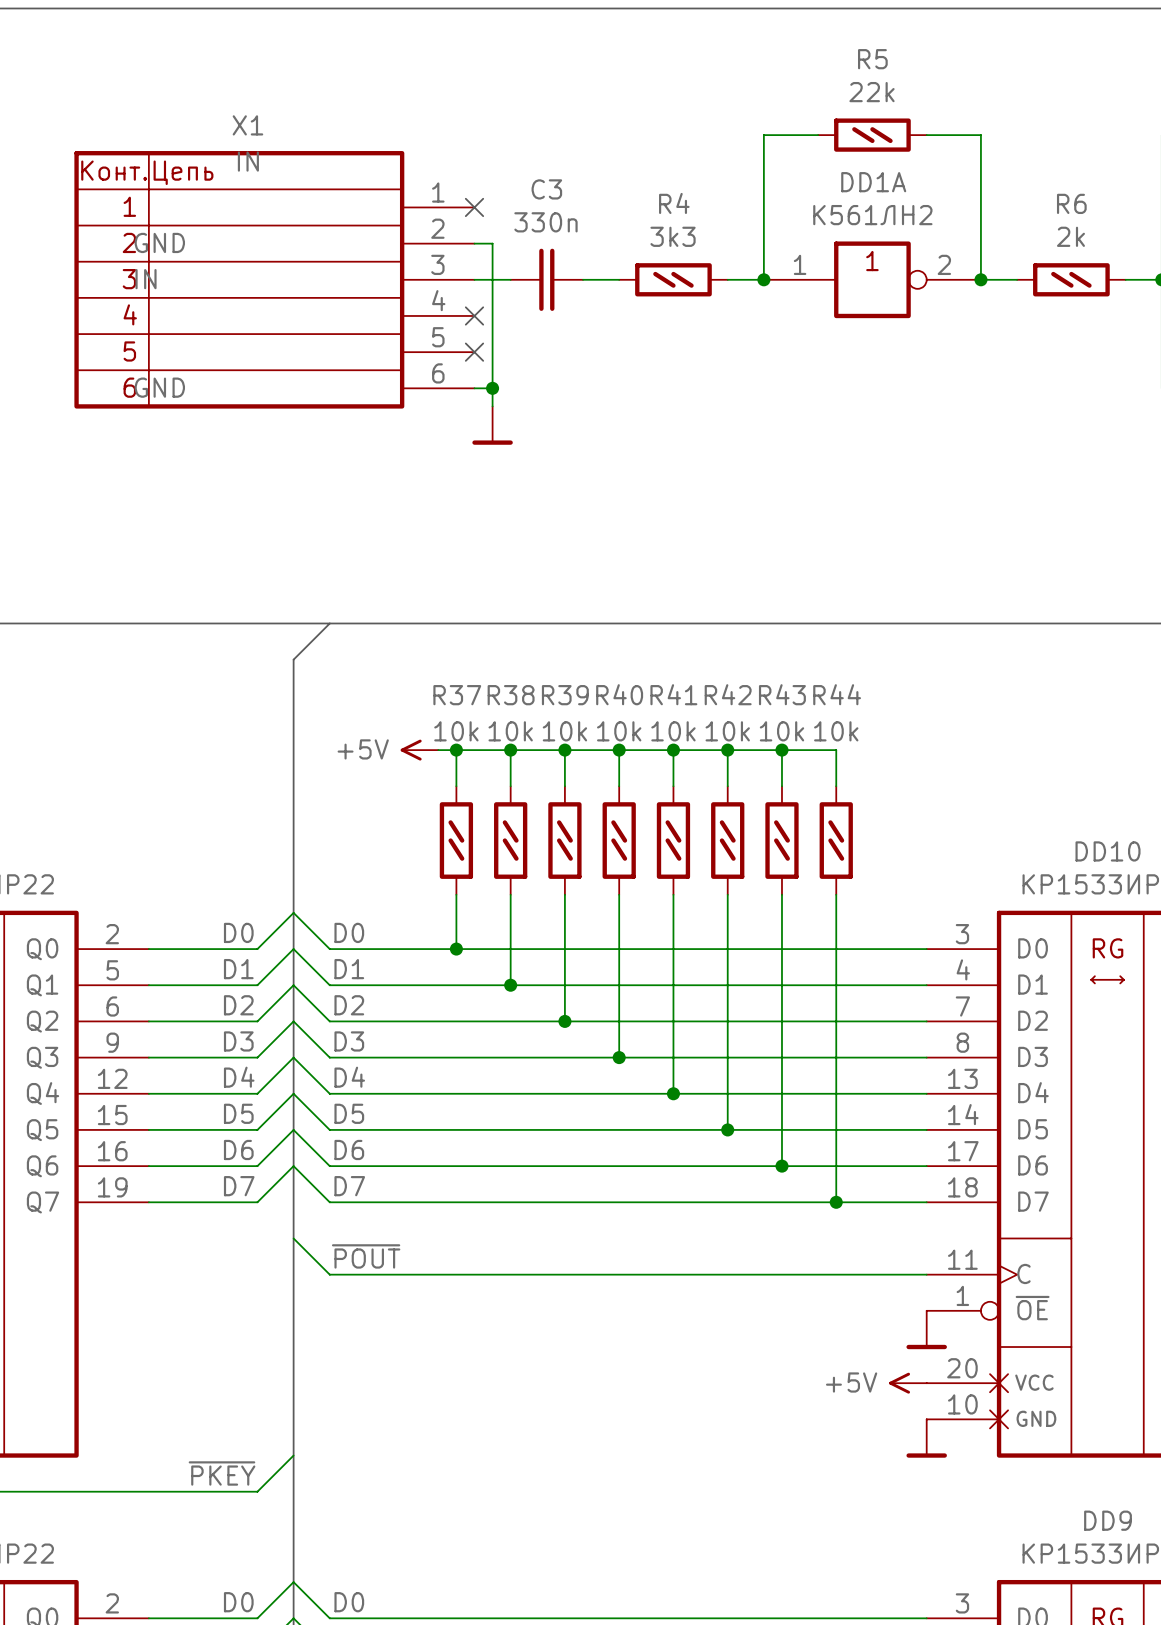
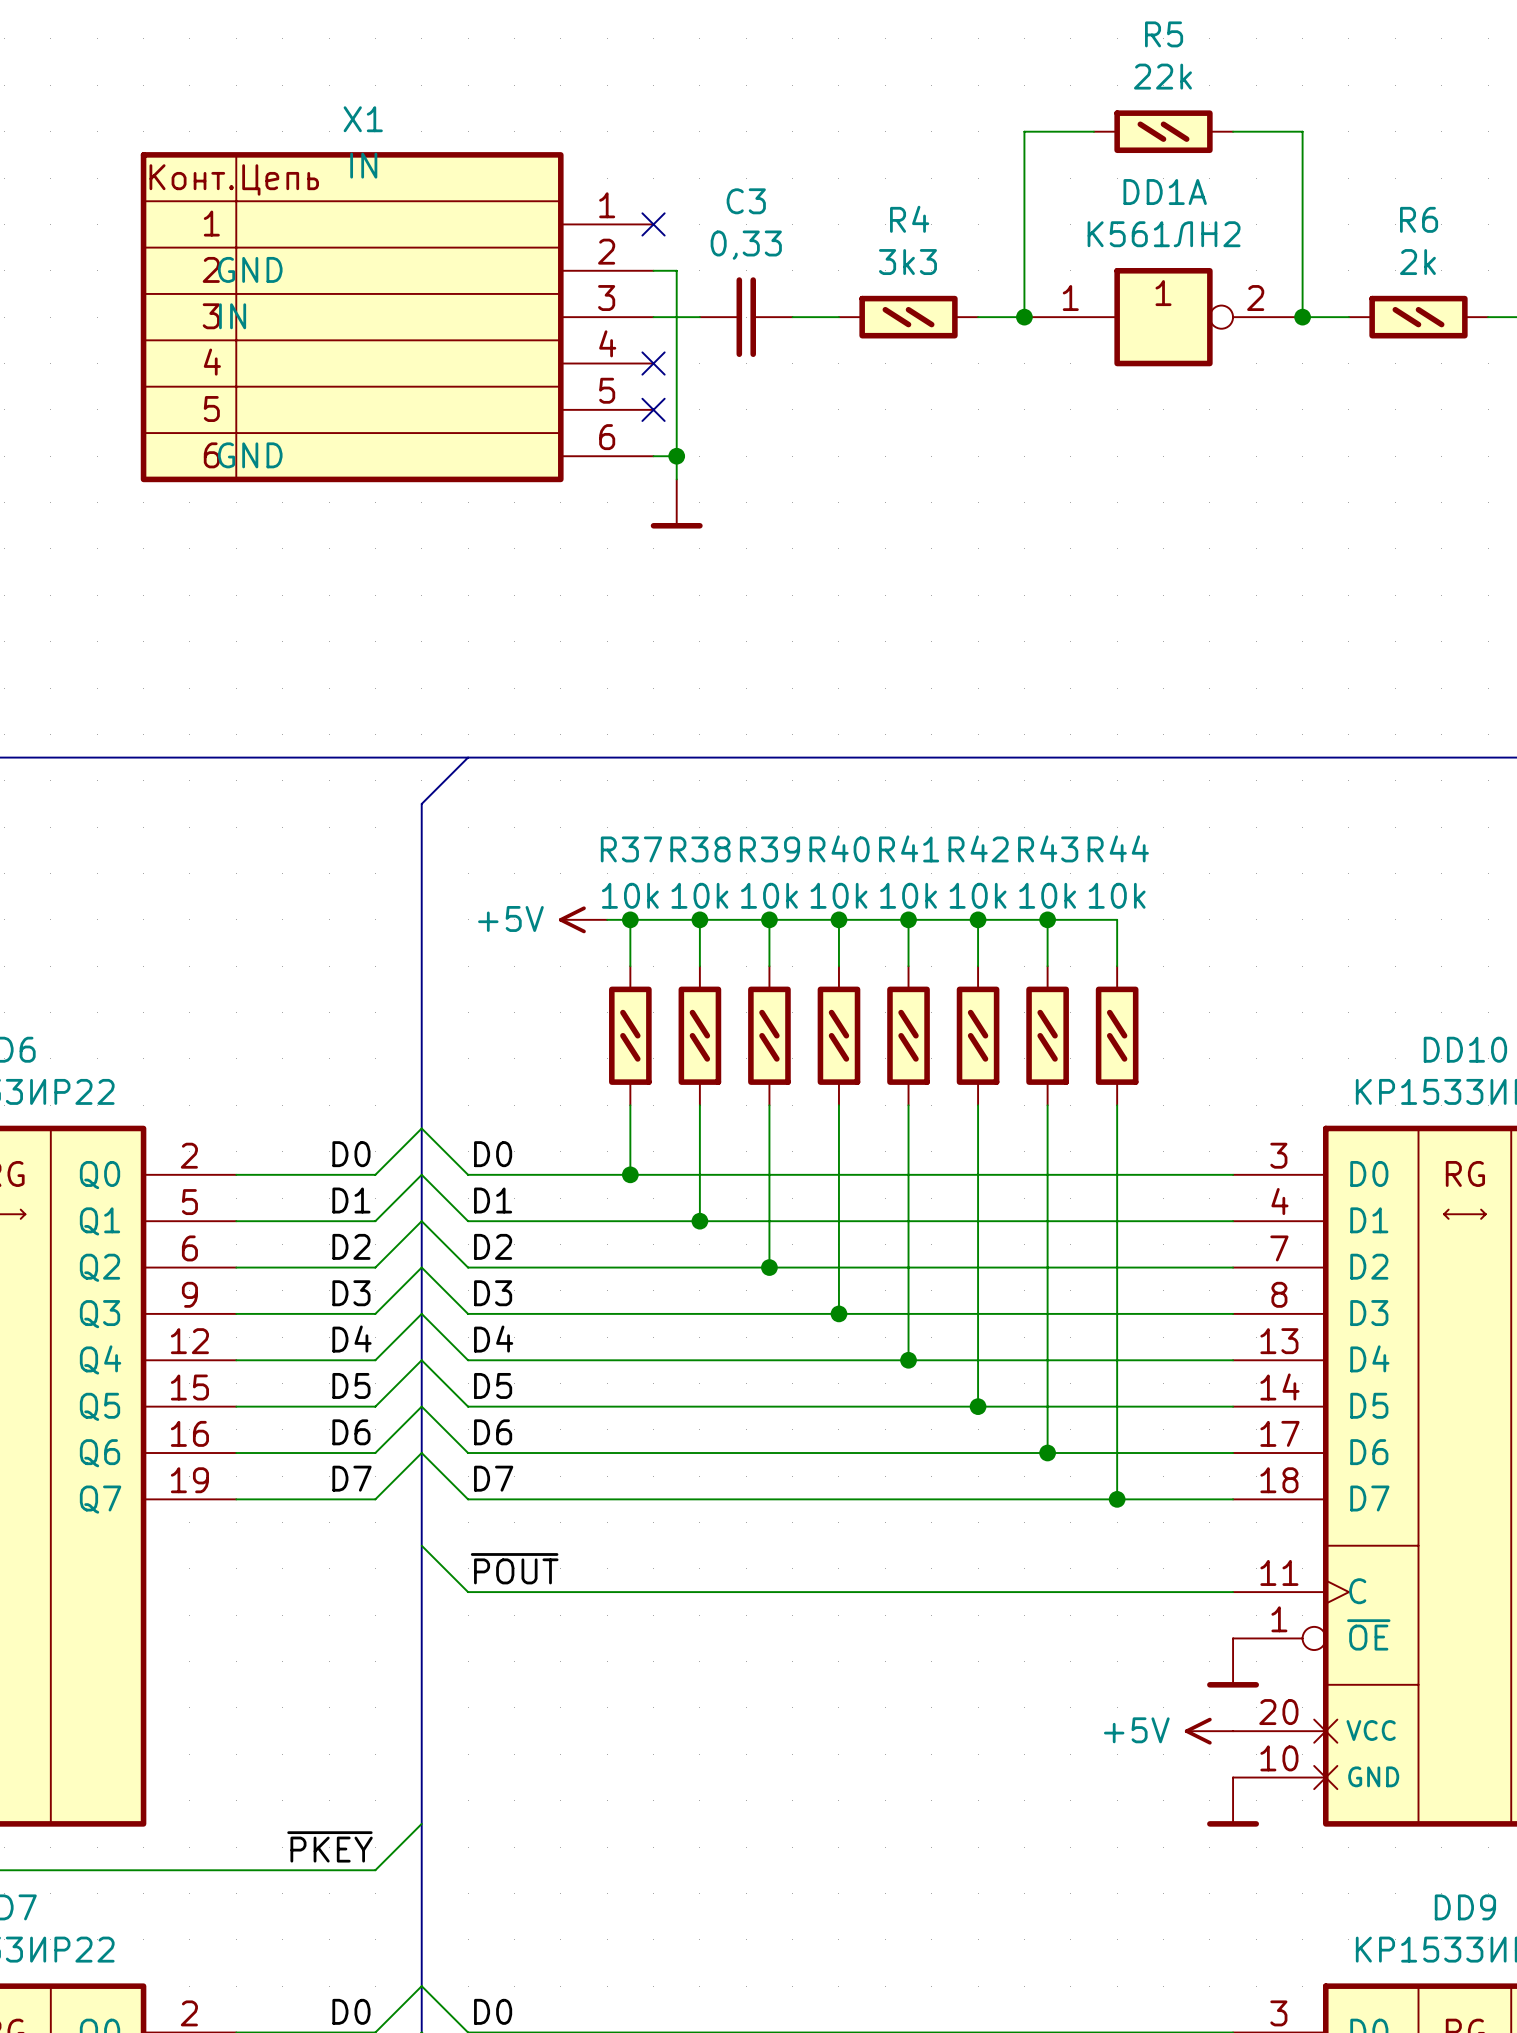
C3 value: 330n (545, 222) -> 0,33 (746, 245)

